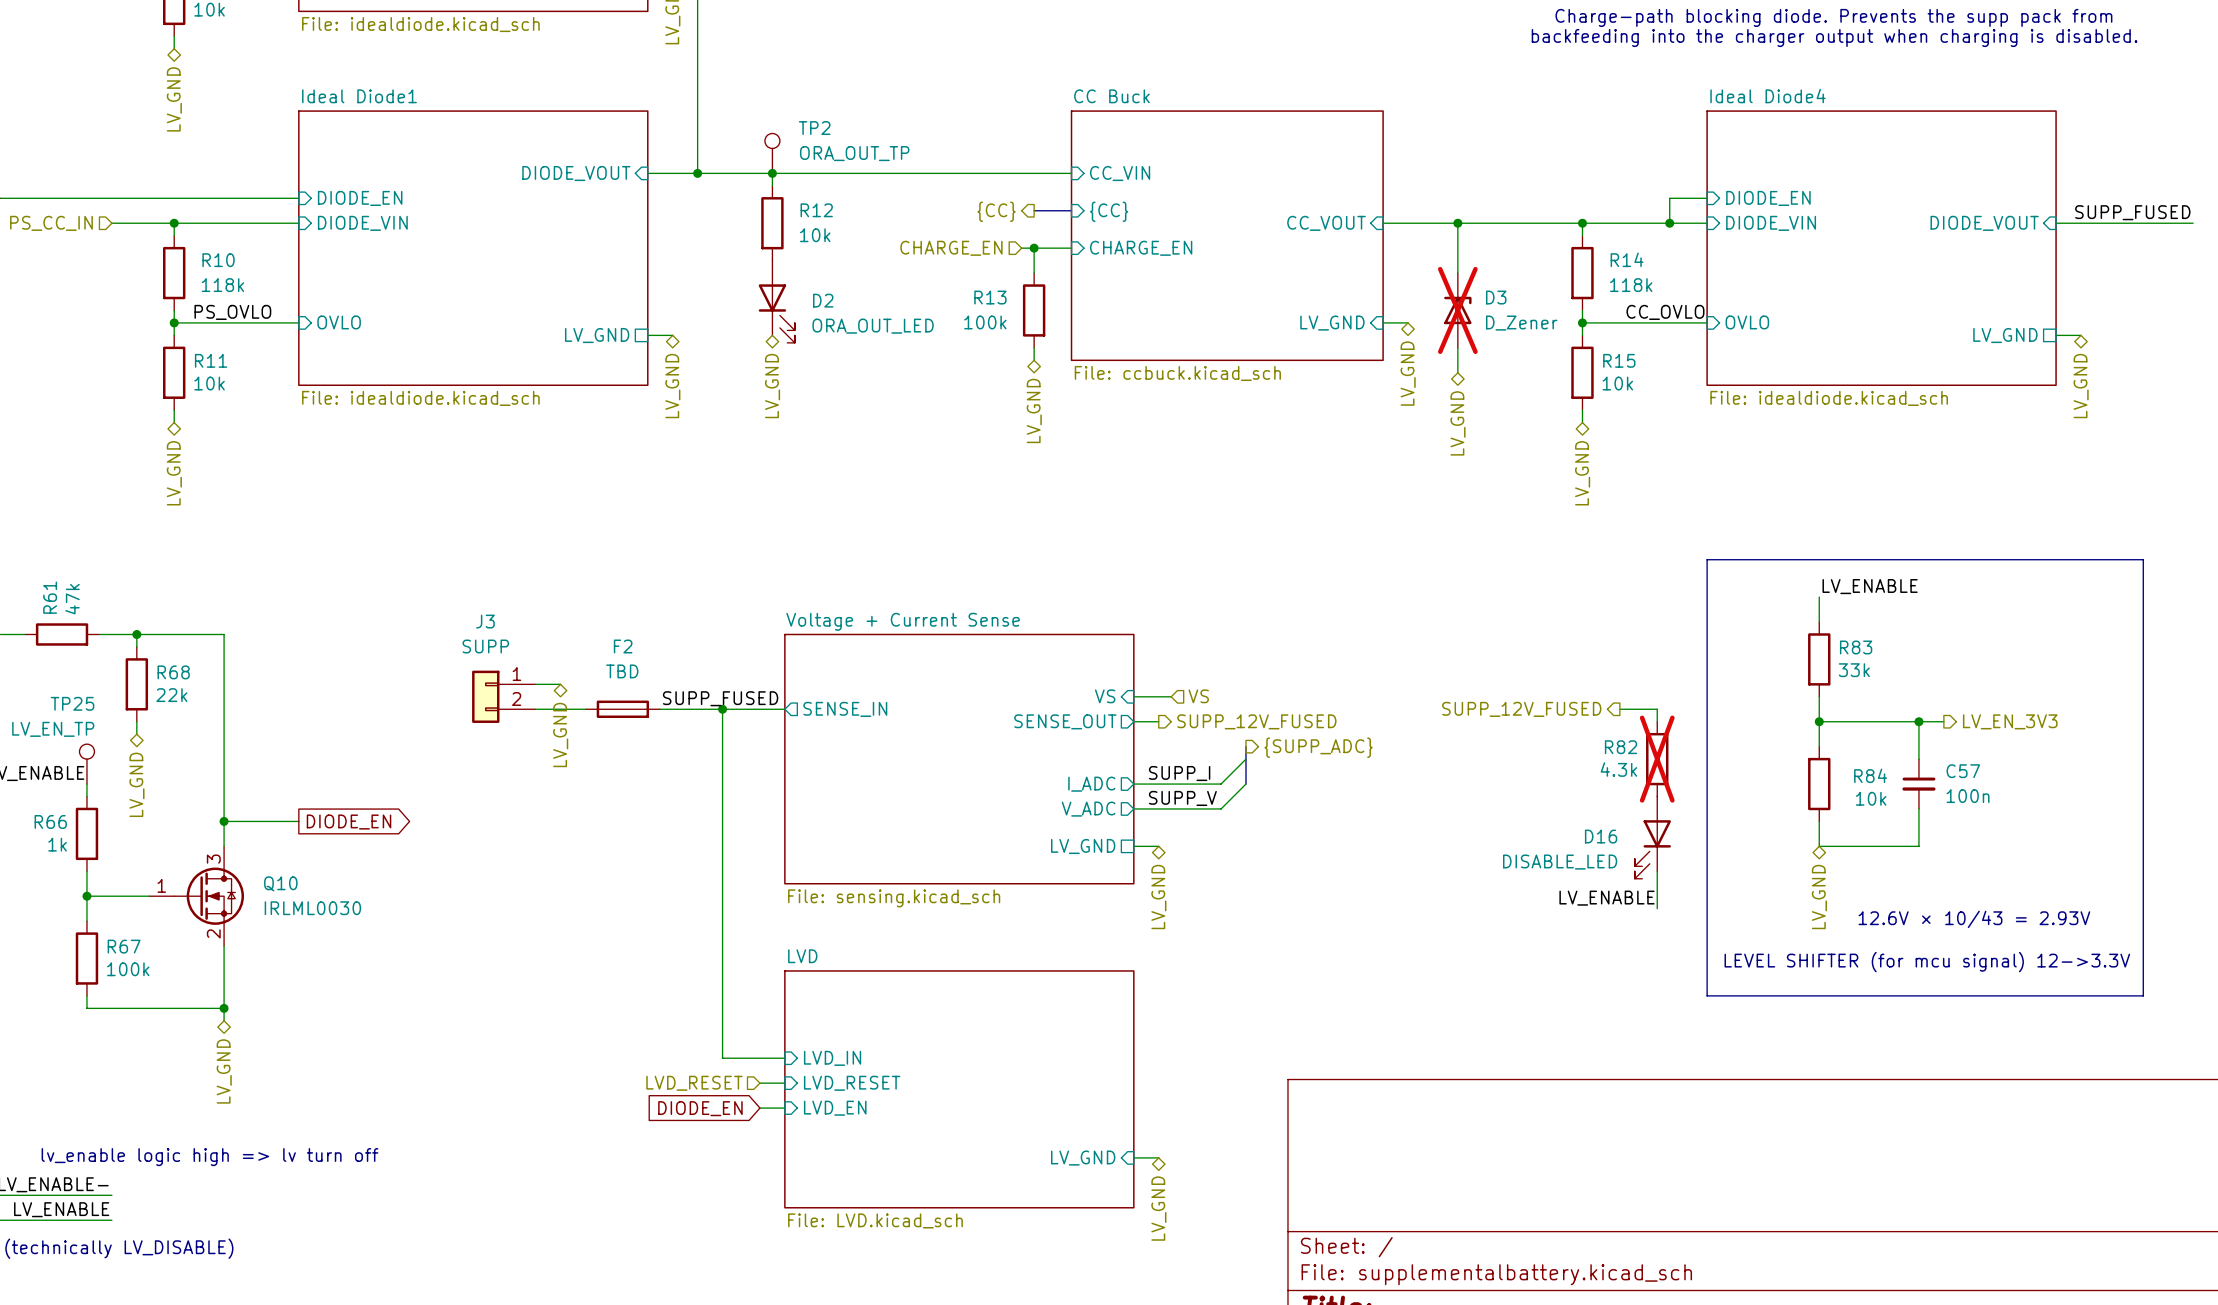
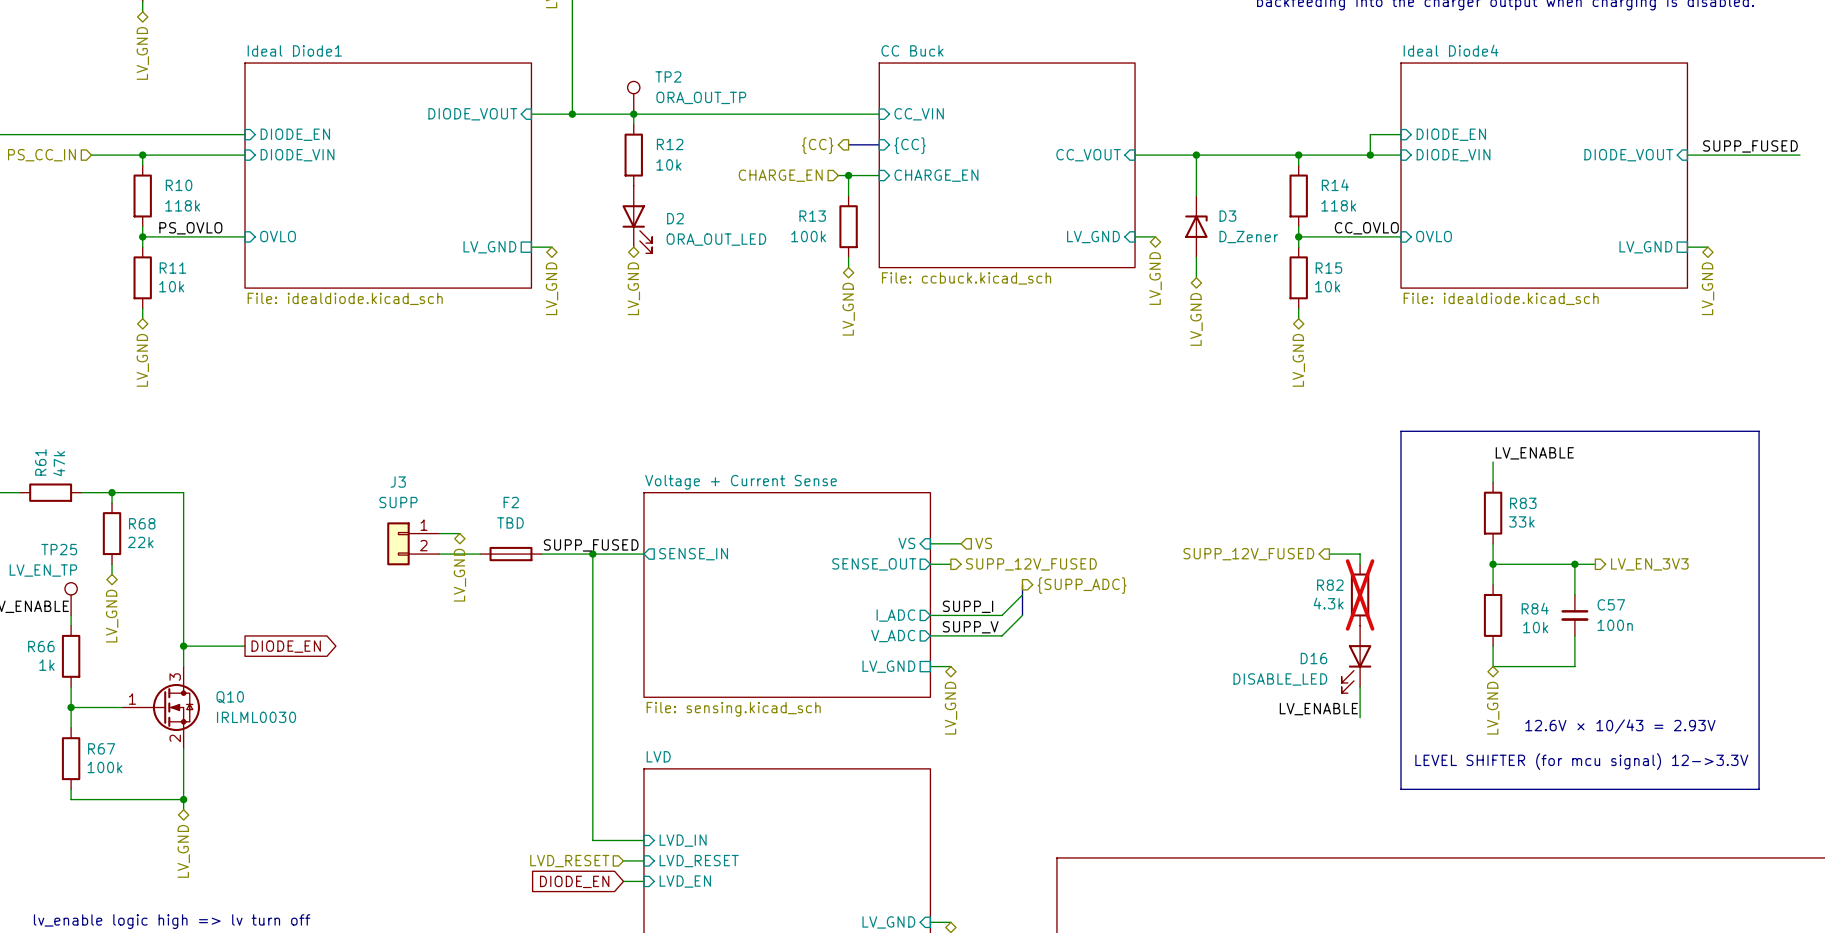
D3 do-not-place cross: (1457, 310) -> none

